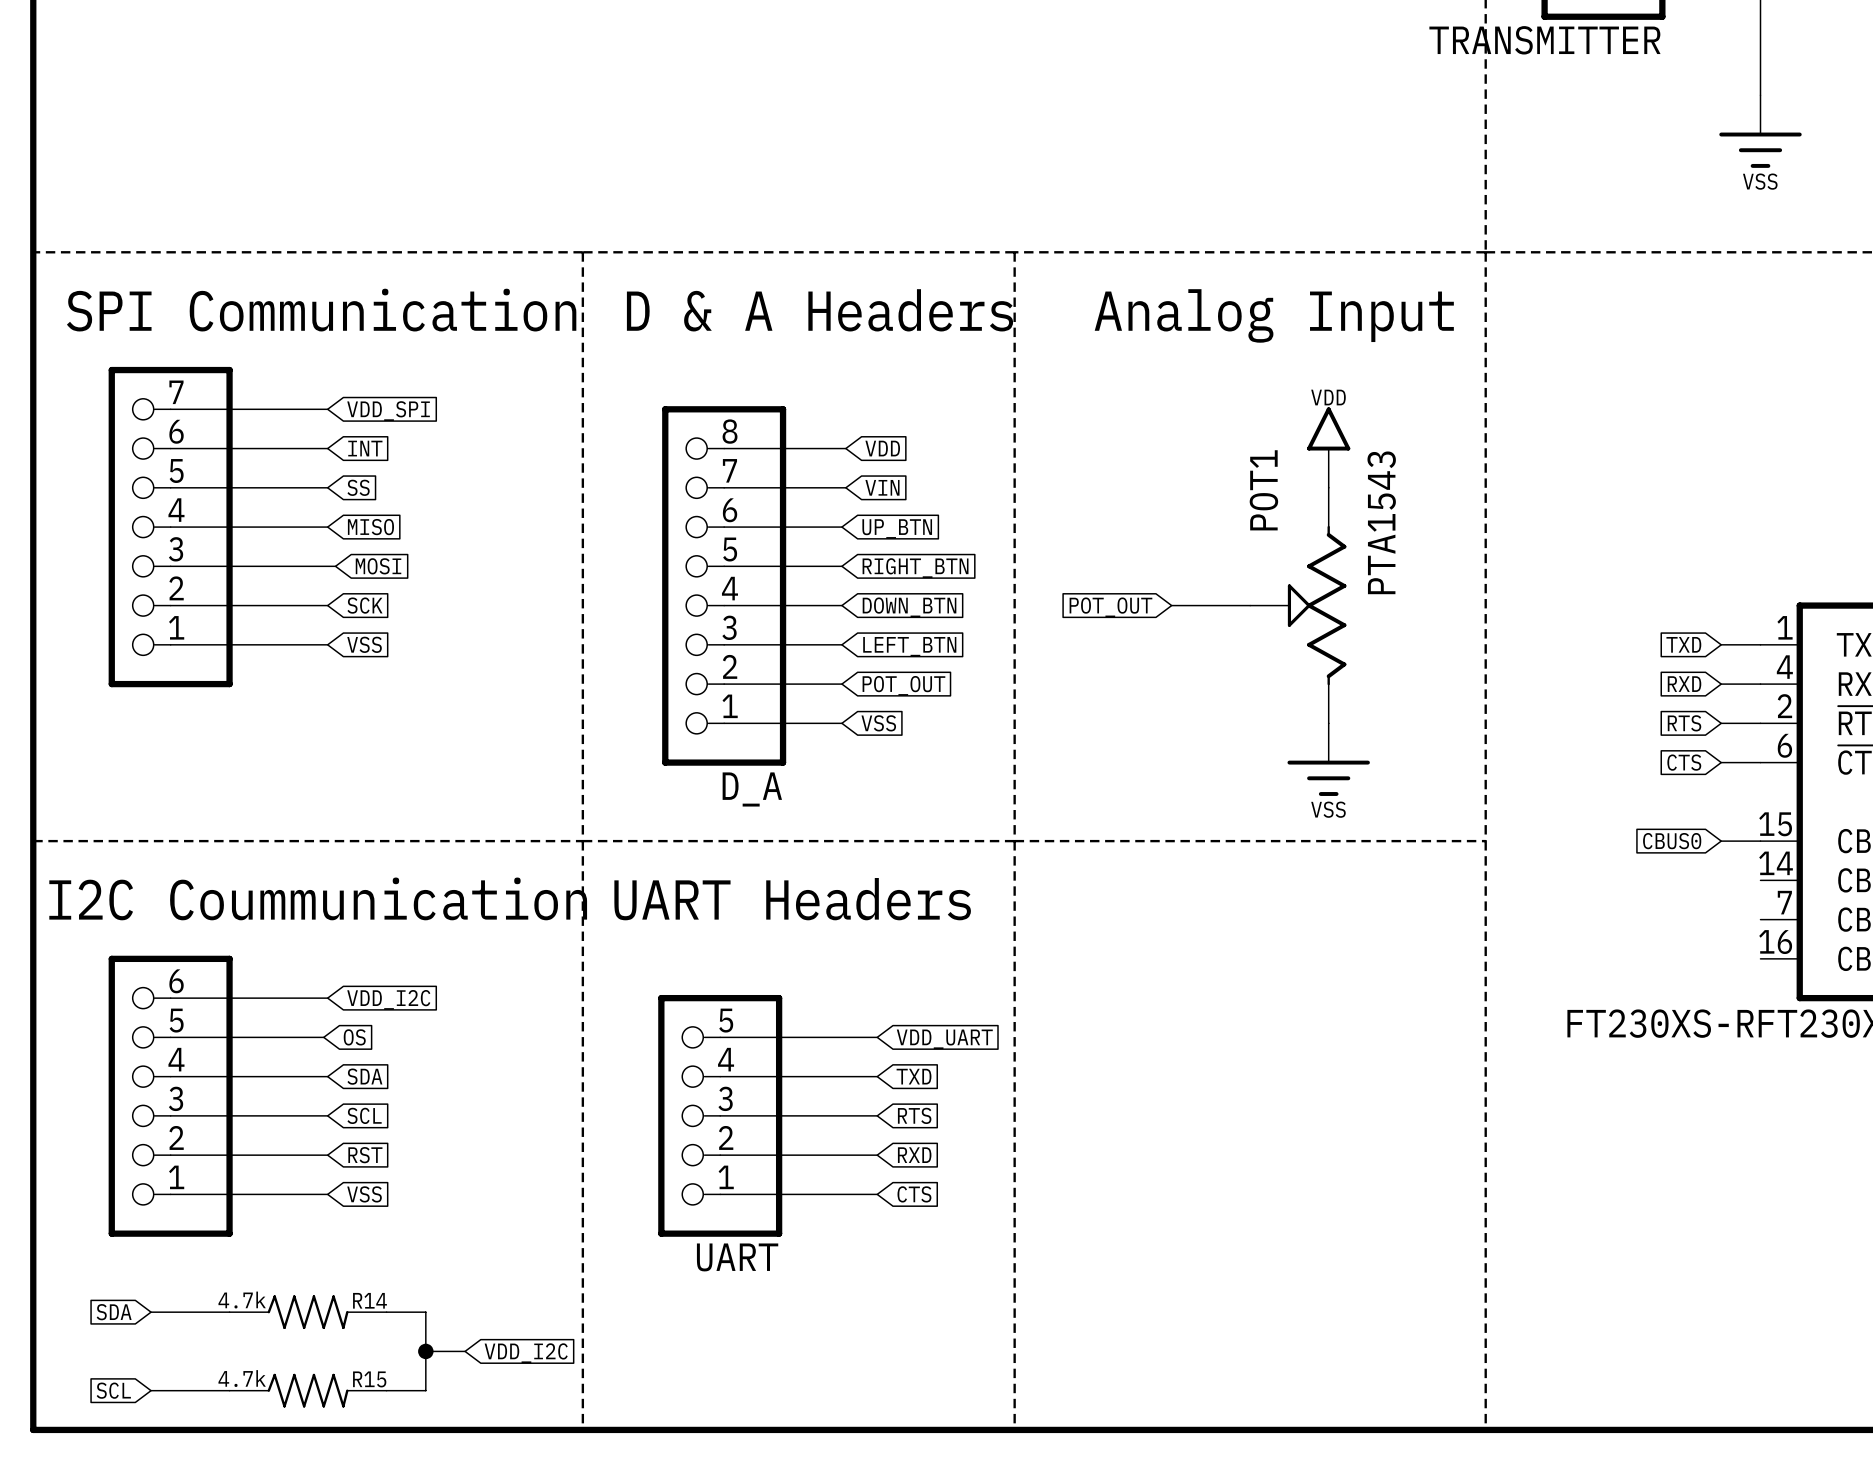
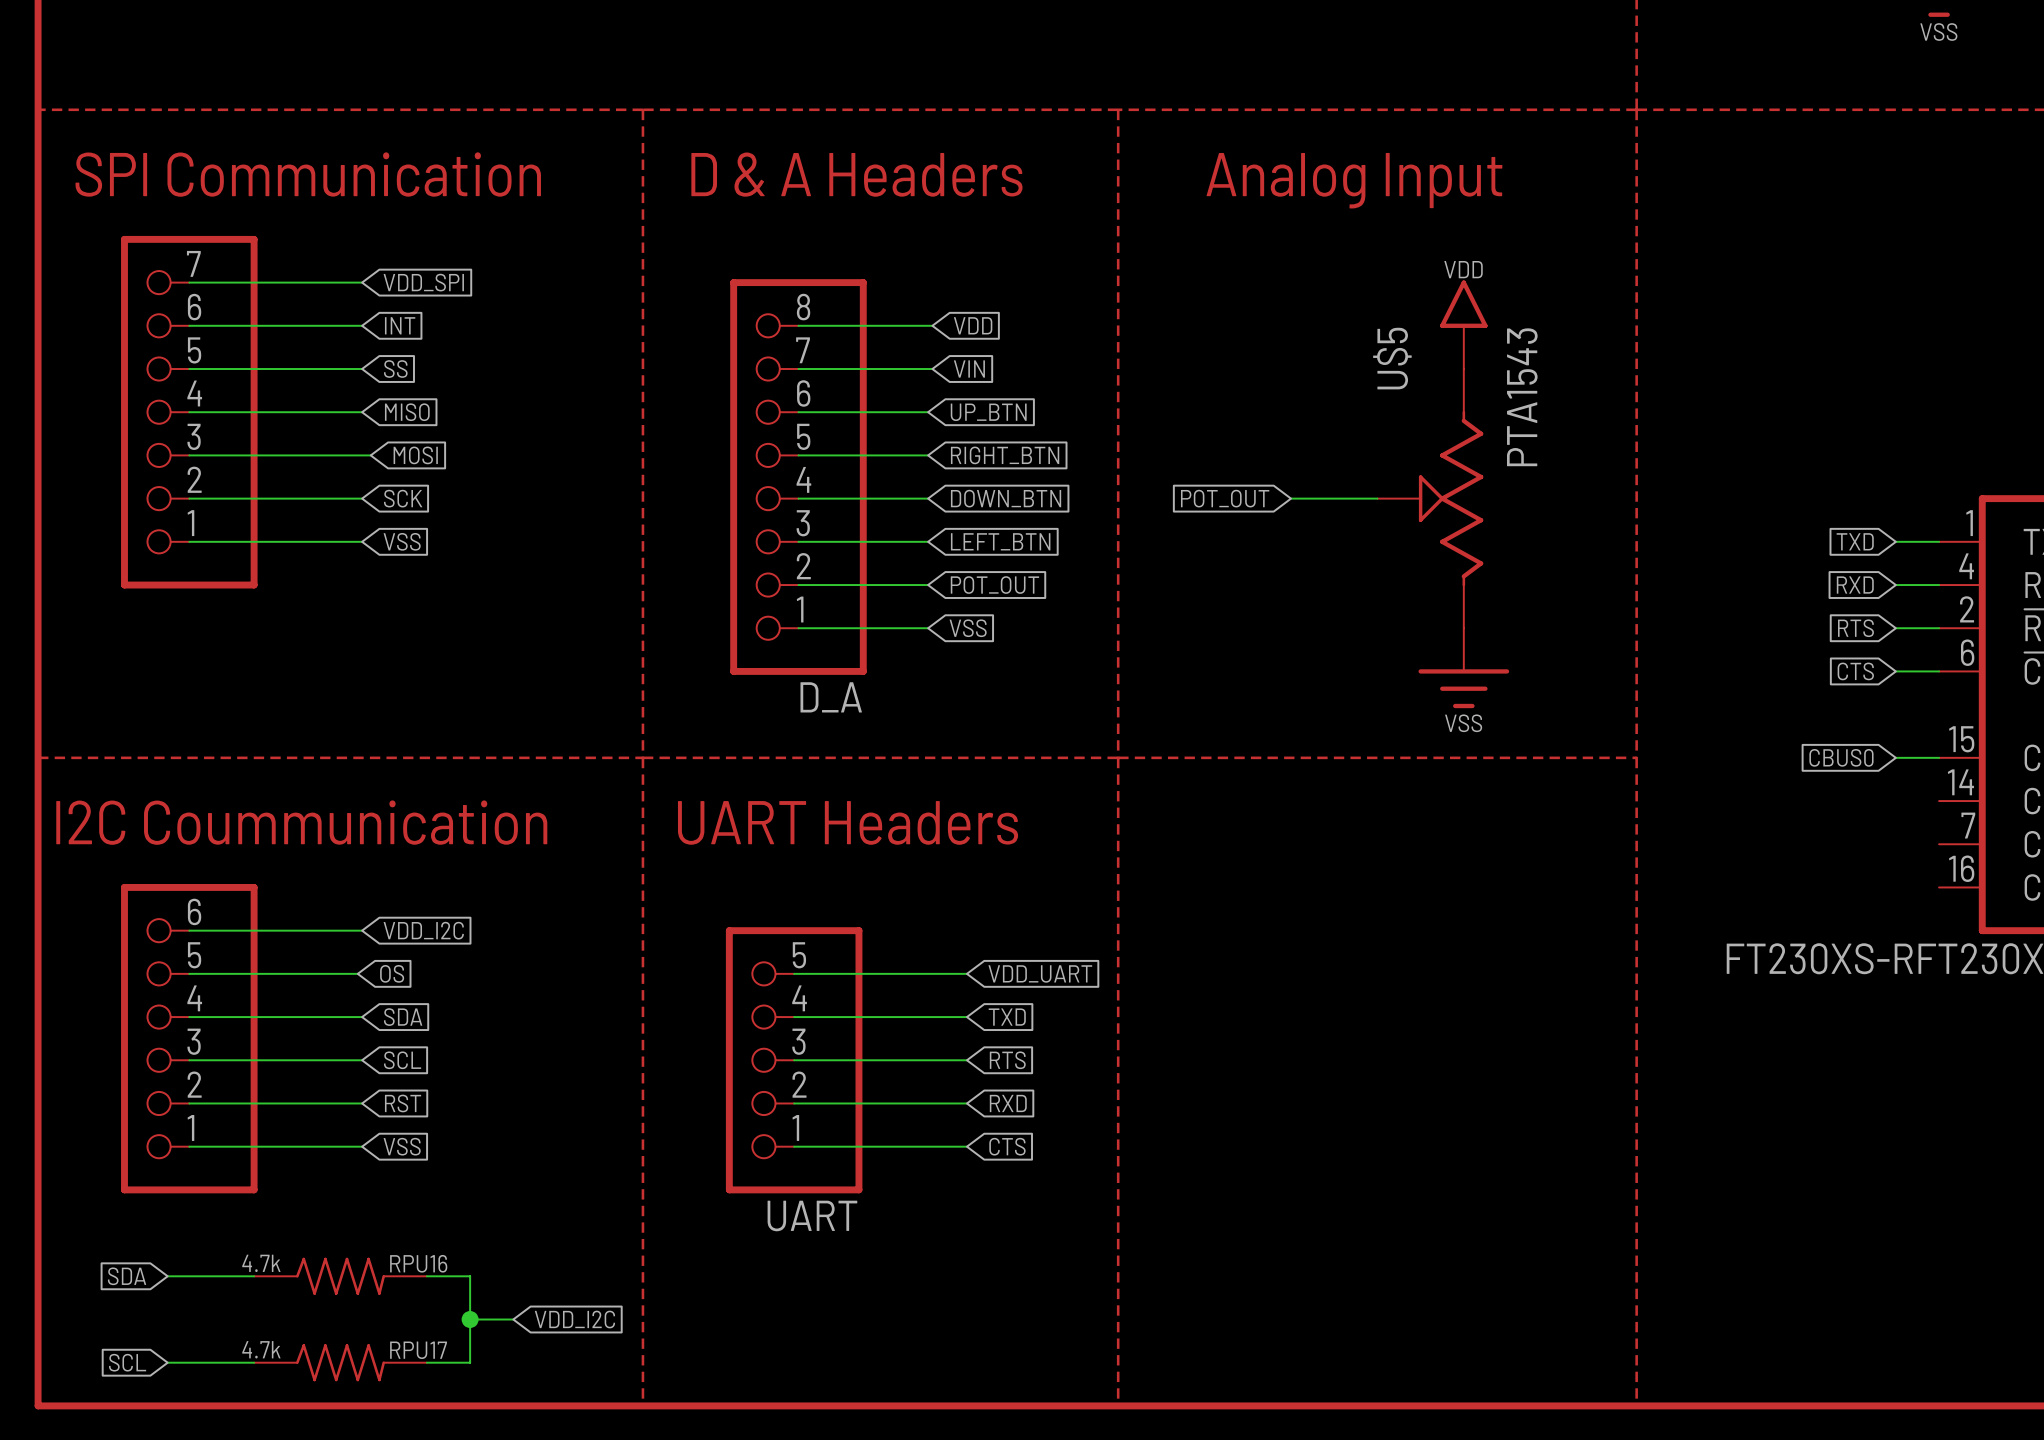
POT1 name: POT1 (1263, 490) -> U$5 (1392, 358)
R14 name: R14 (369, 1300) -> RPU16 (418, 1263)
R15 name: R15 (369, 1379) -> RPU17 (418, 1350)

